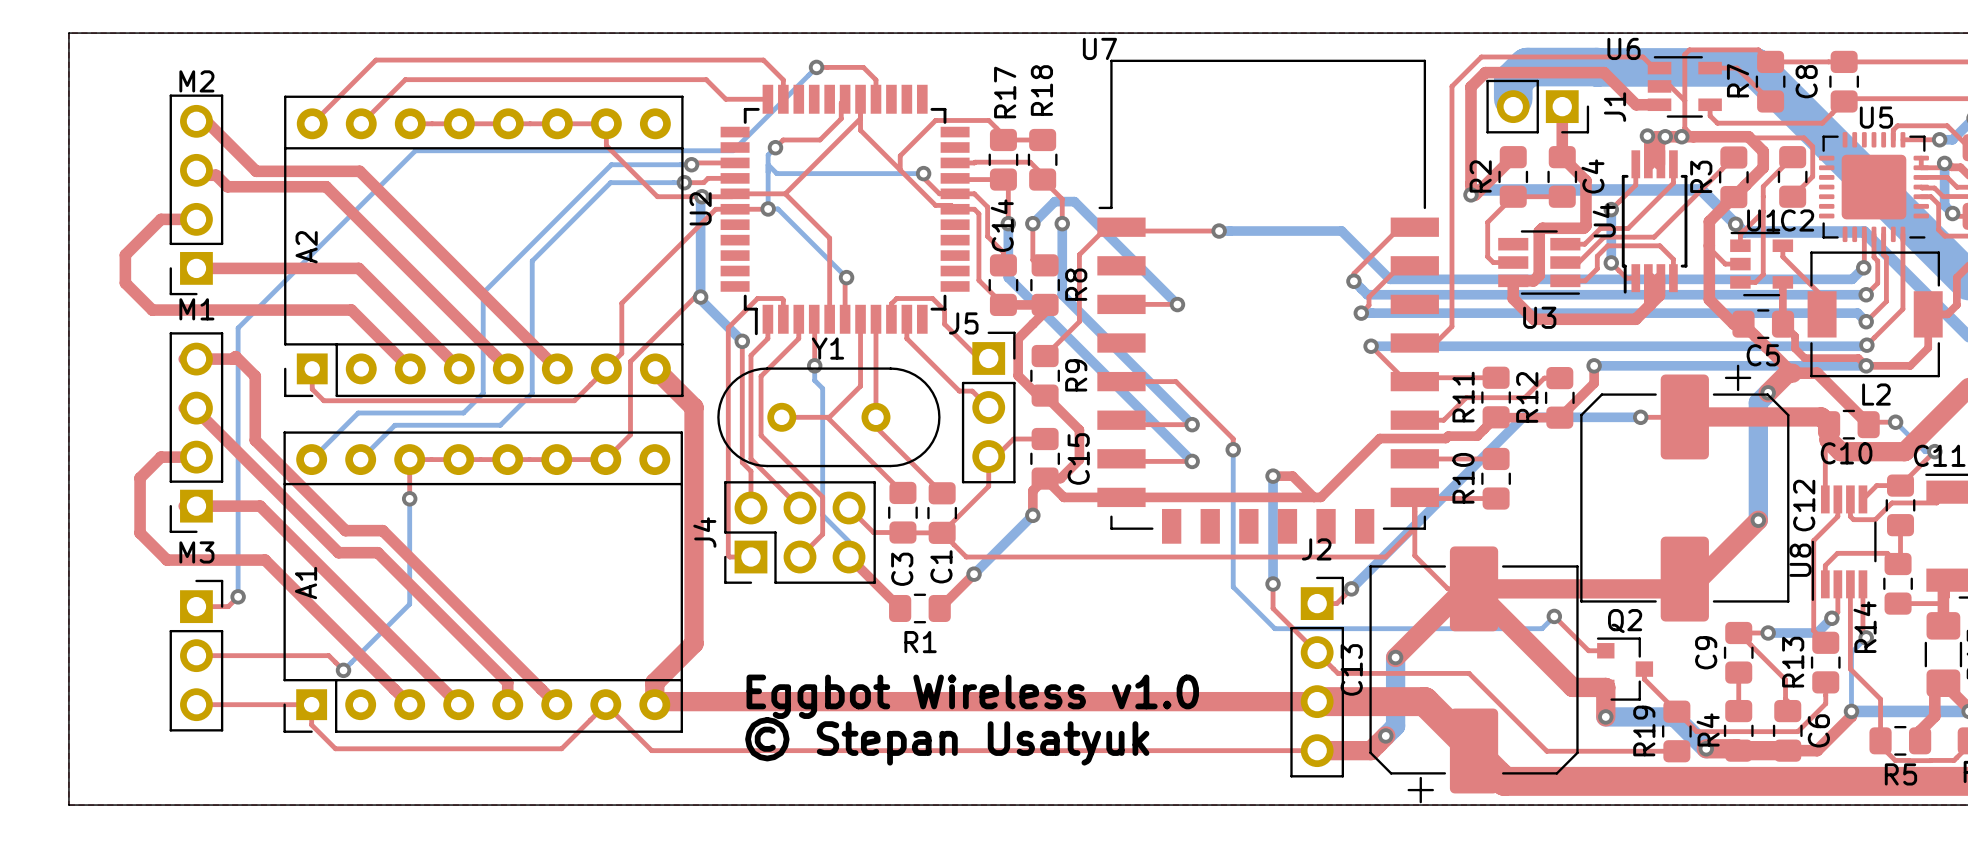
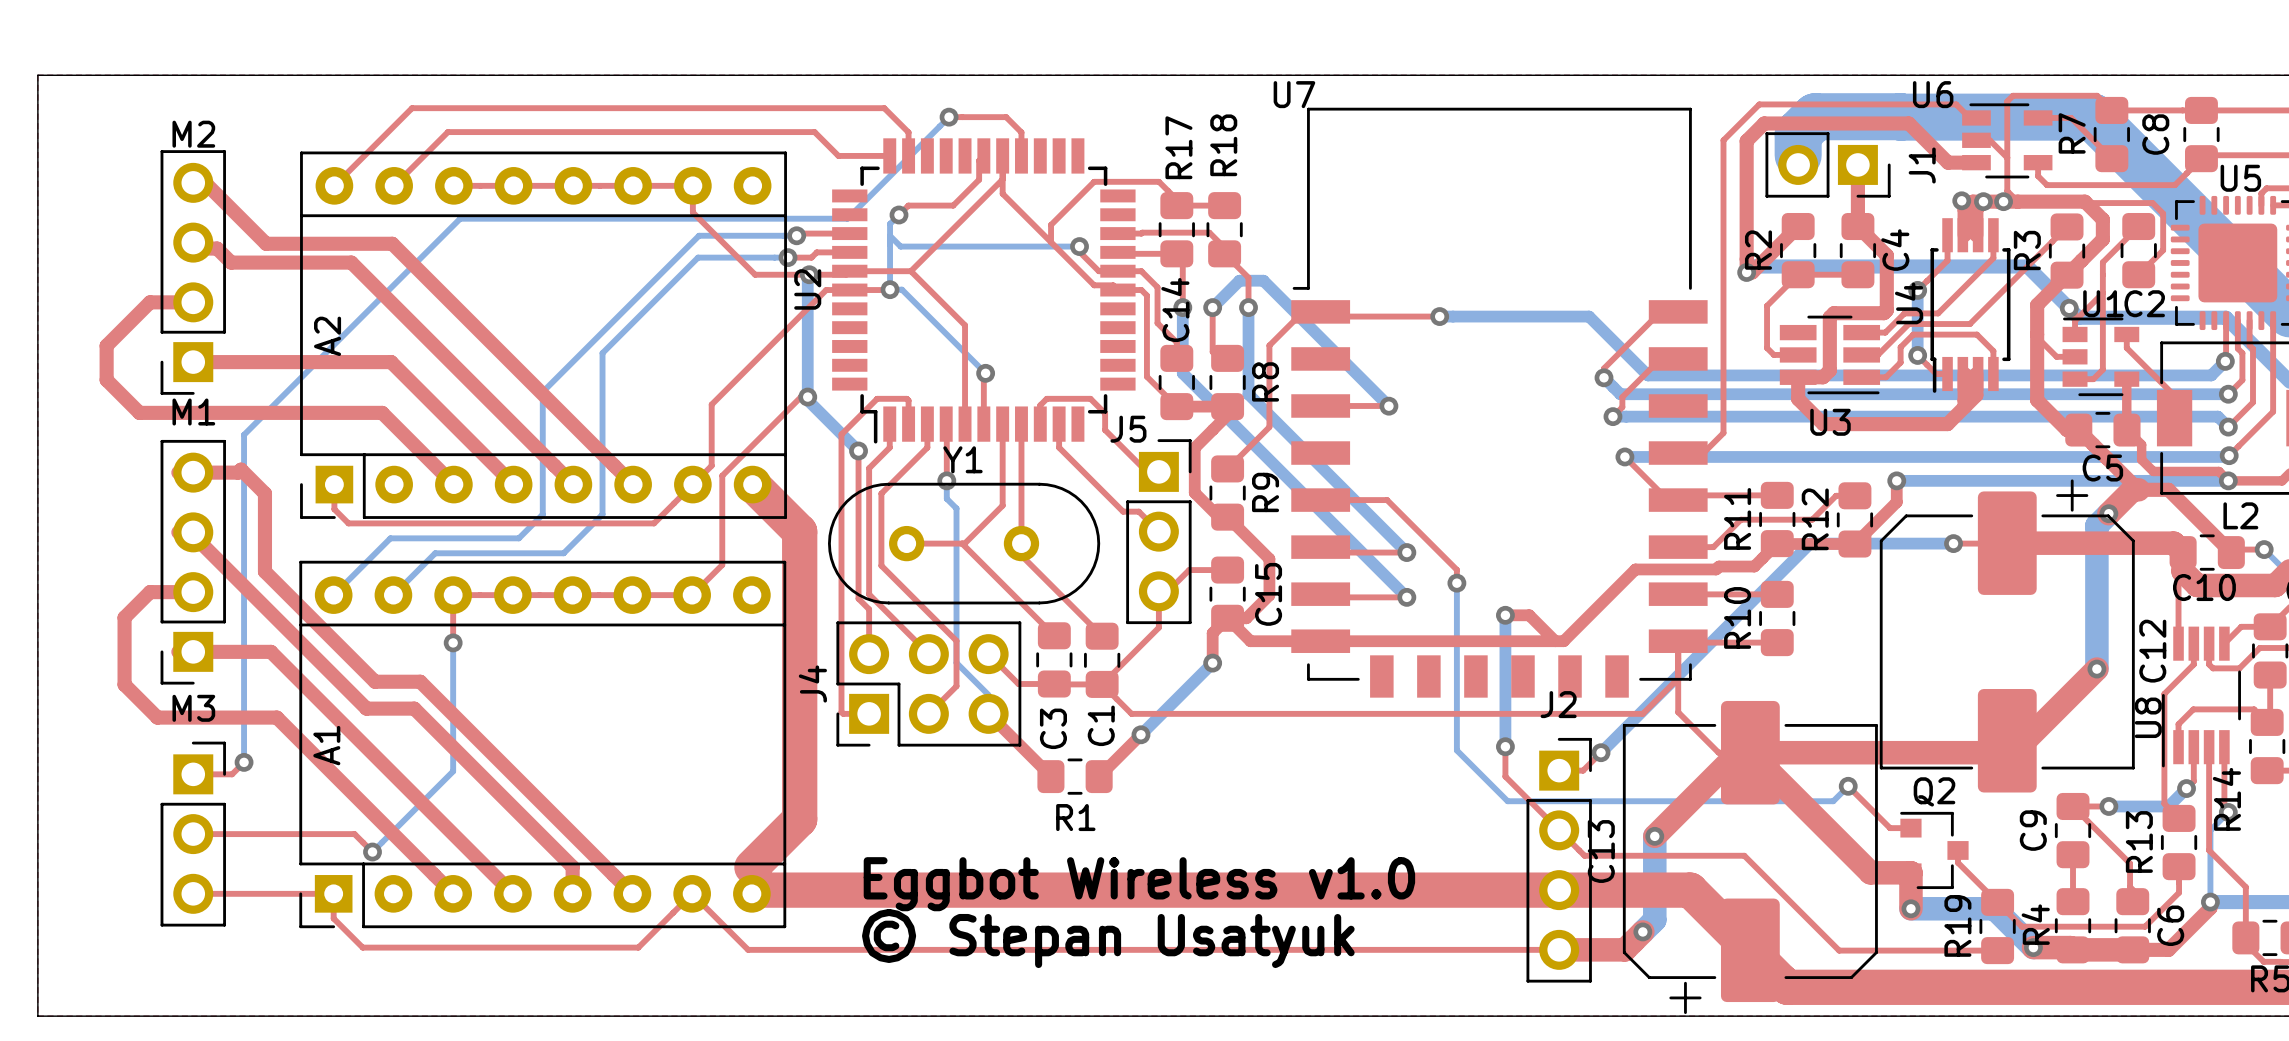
top track width: thin (655, 368) (694, 407) (694, 643) (654, 682) -> thick (752, 484) (799, 531) (799, 819) (751, 867)
top track width: thin (657, 701) (1317, 701) -> thick (755, 890) (1559, 890)

